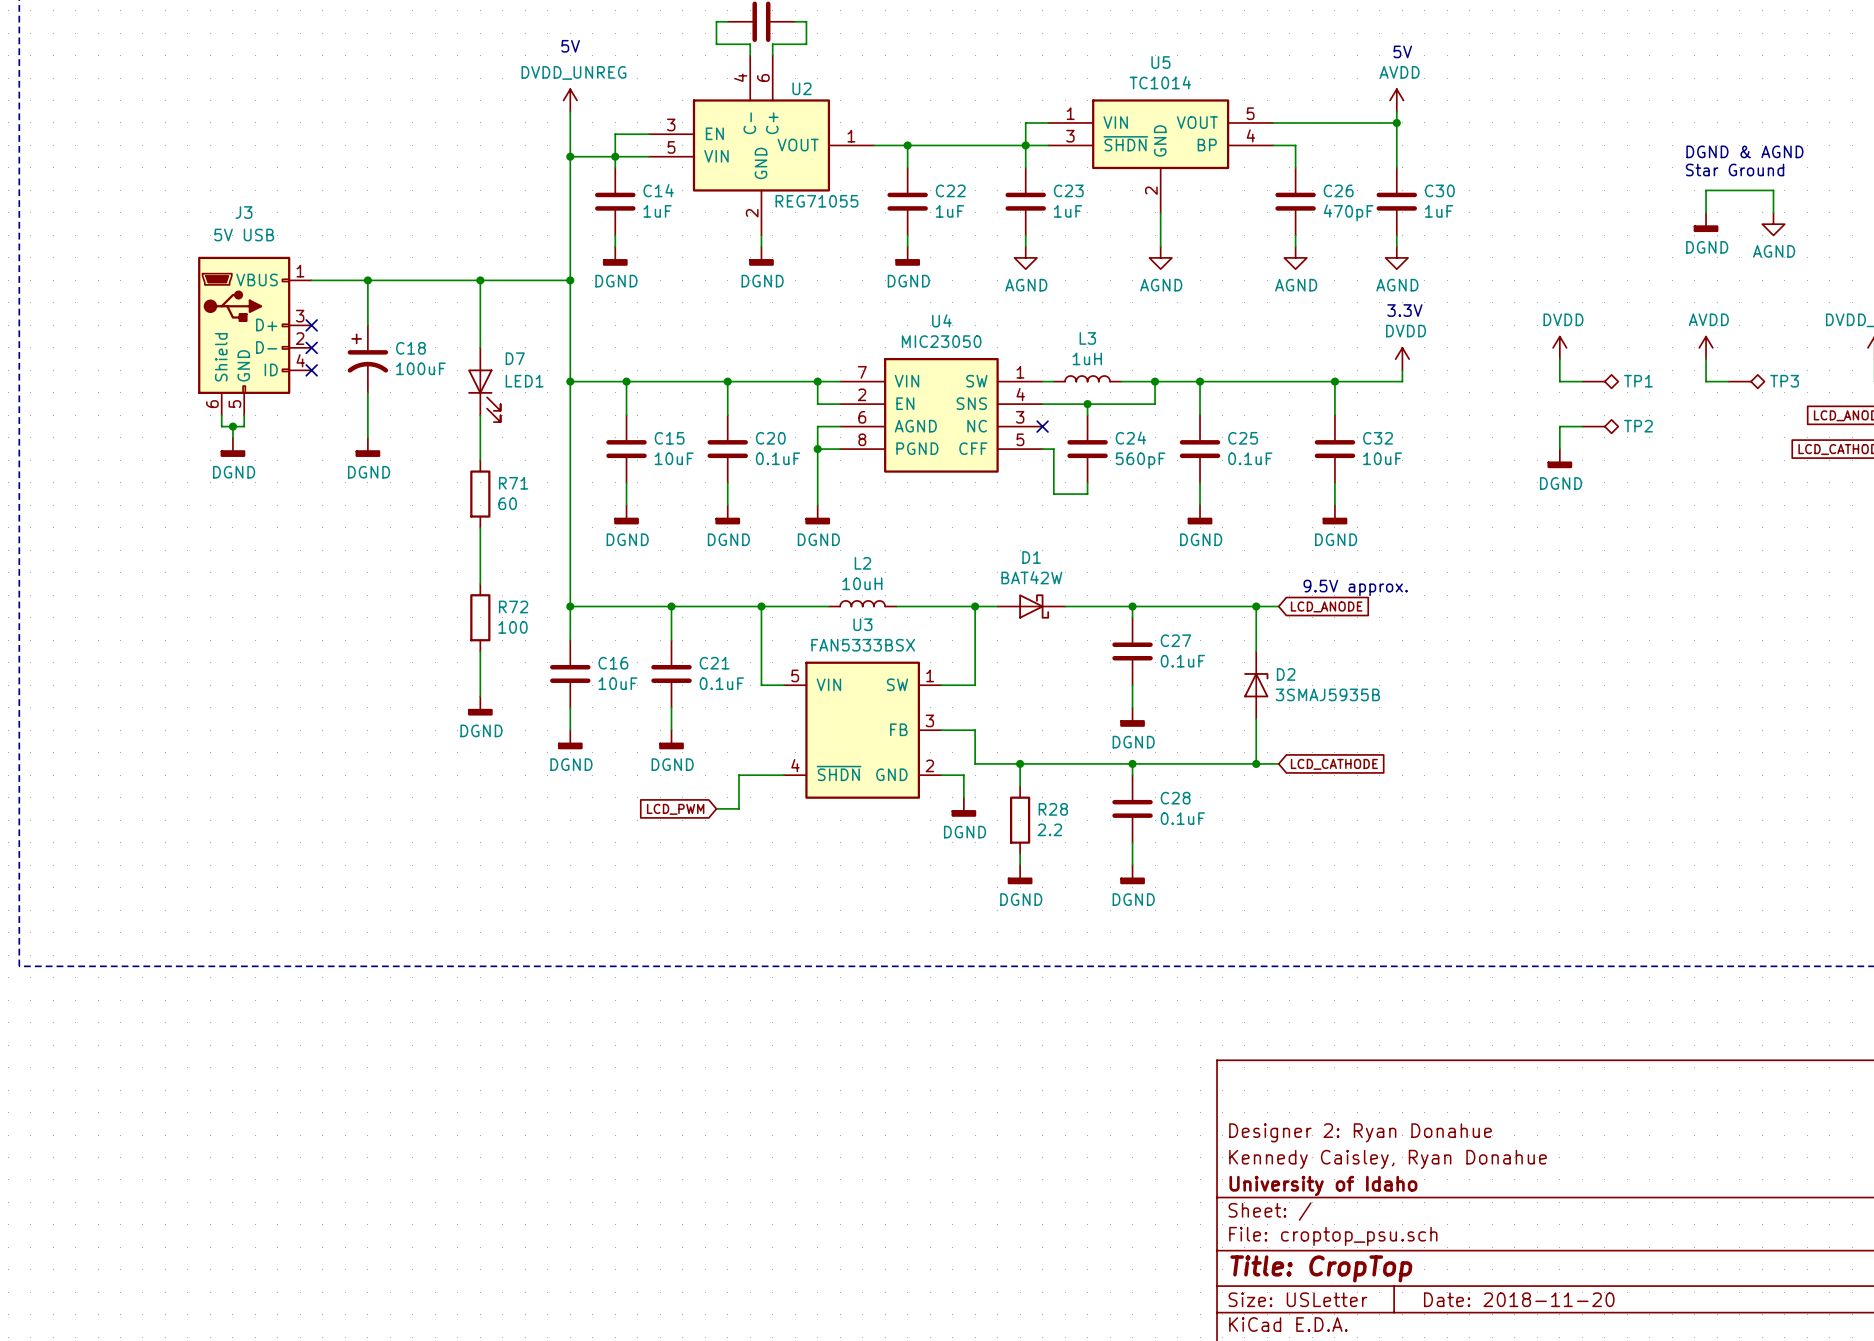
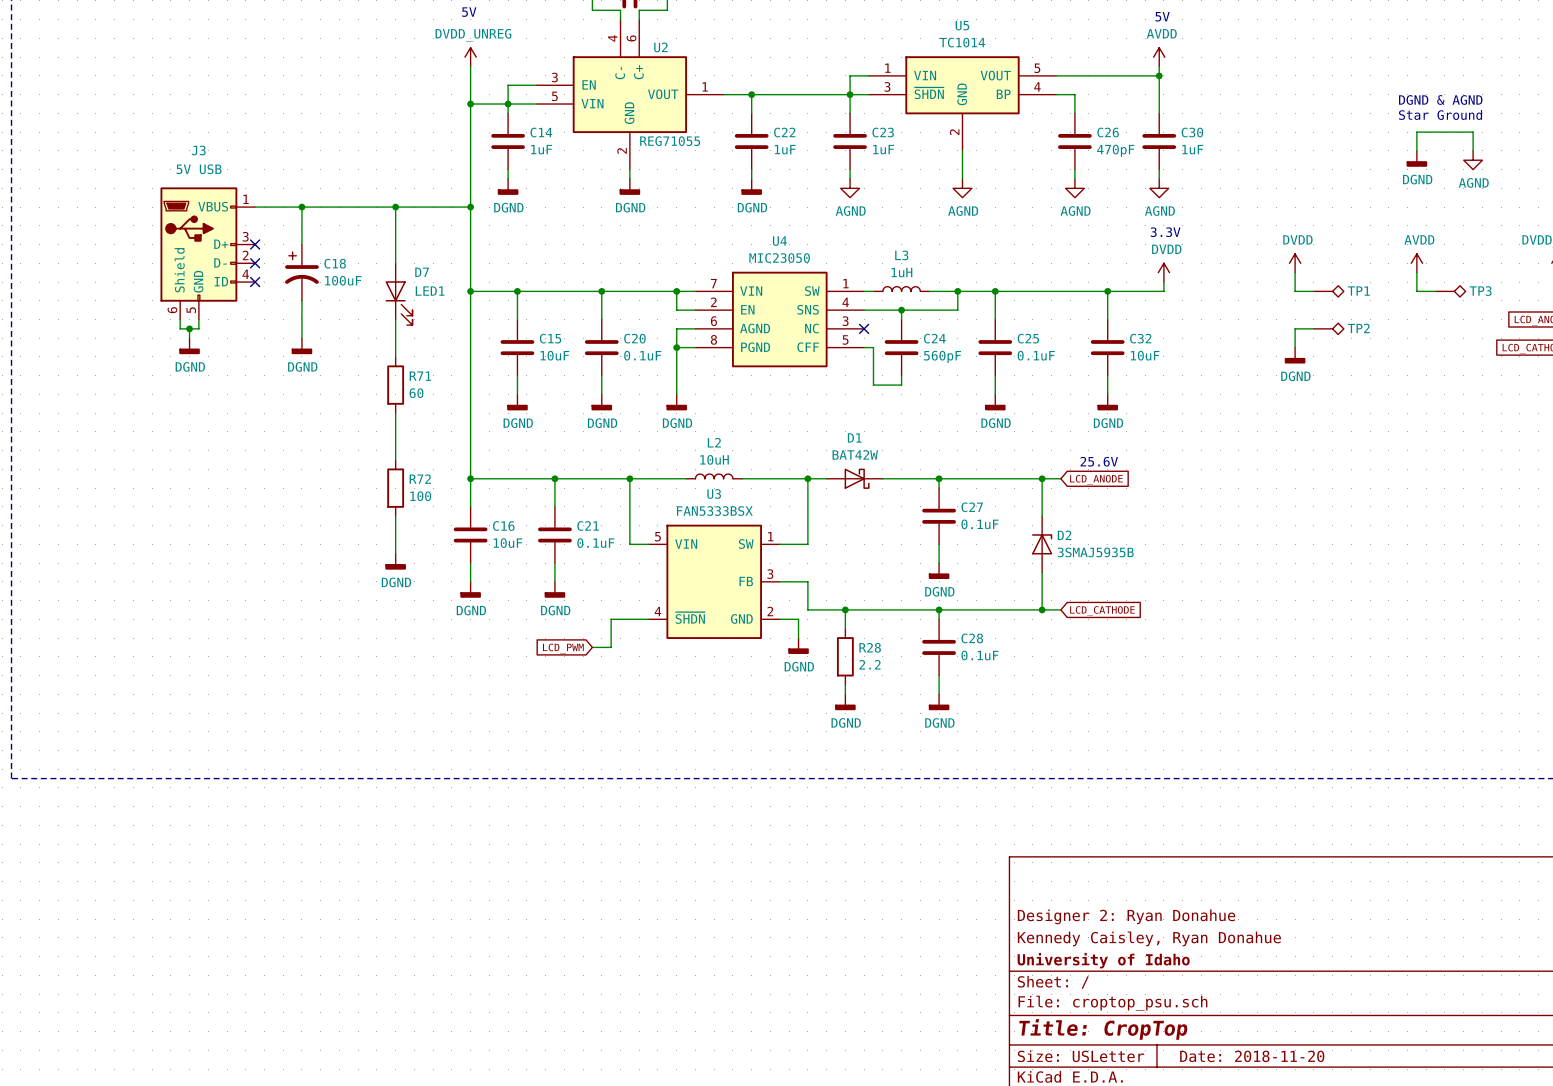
text: 9.5V approx. (1355, 587) -> 25.6V (1099, 461)

